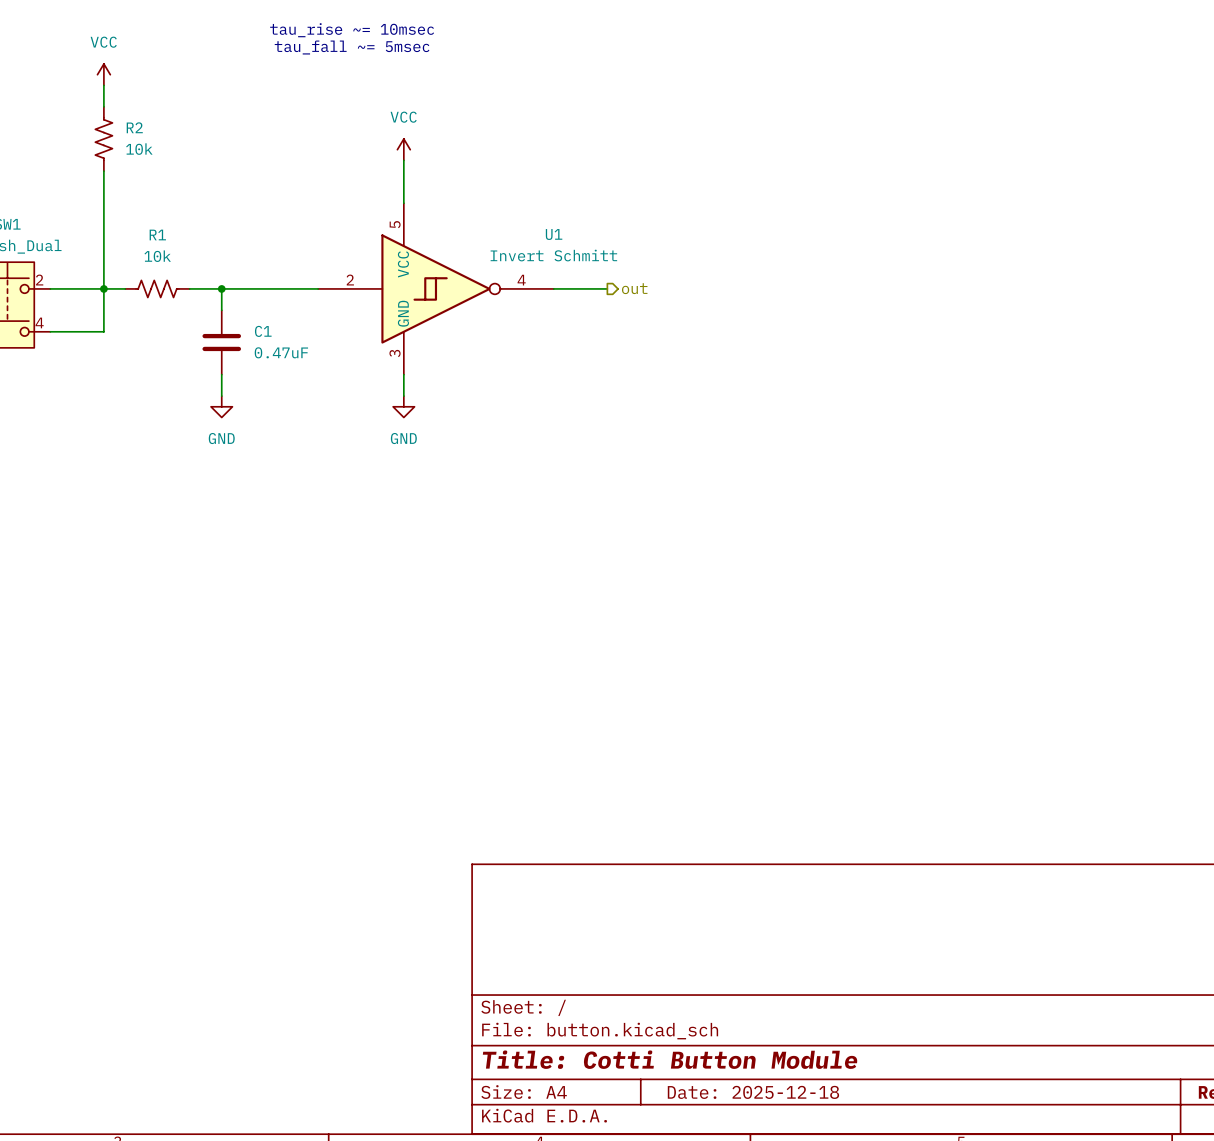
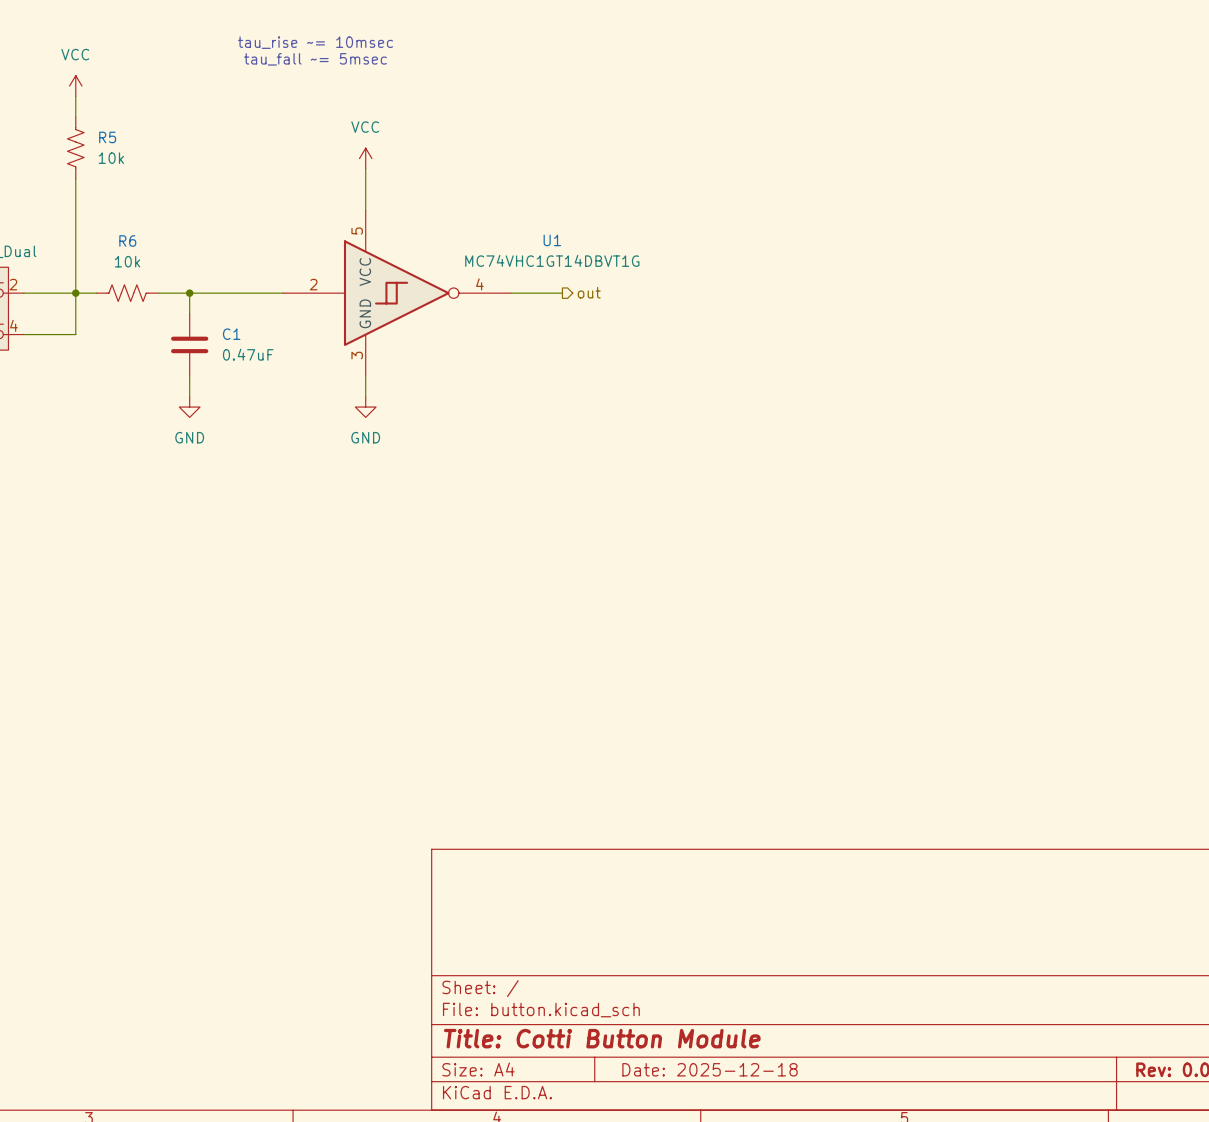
R2 name: R2 (134, 127) -> R5 (107, 137)
U1 name position: U1 (554, 234) -> U1 (552, 240)
R1 name: R1 (157, 235) -> R6 (127, 240)
U1 value: Invert Schmitt (553, 255) -> MC74VHC1GT14DBVT1G (552, 260)

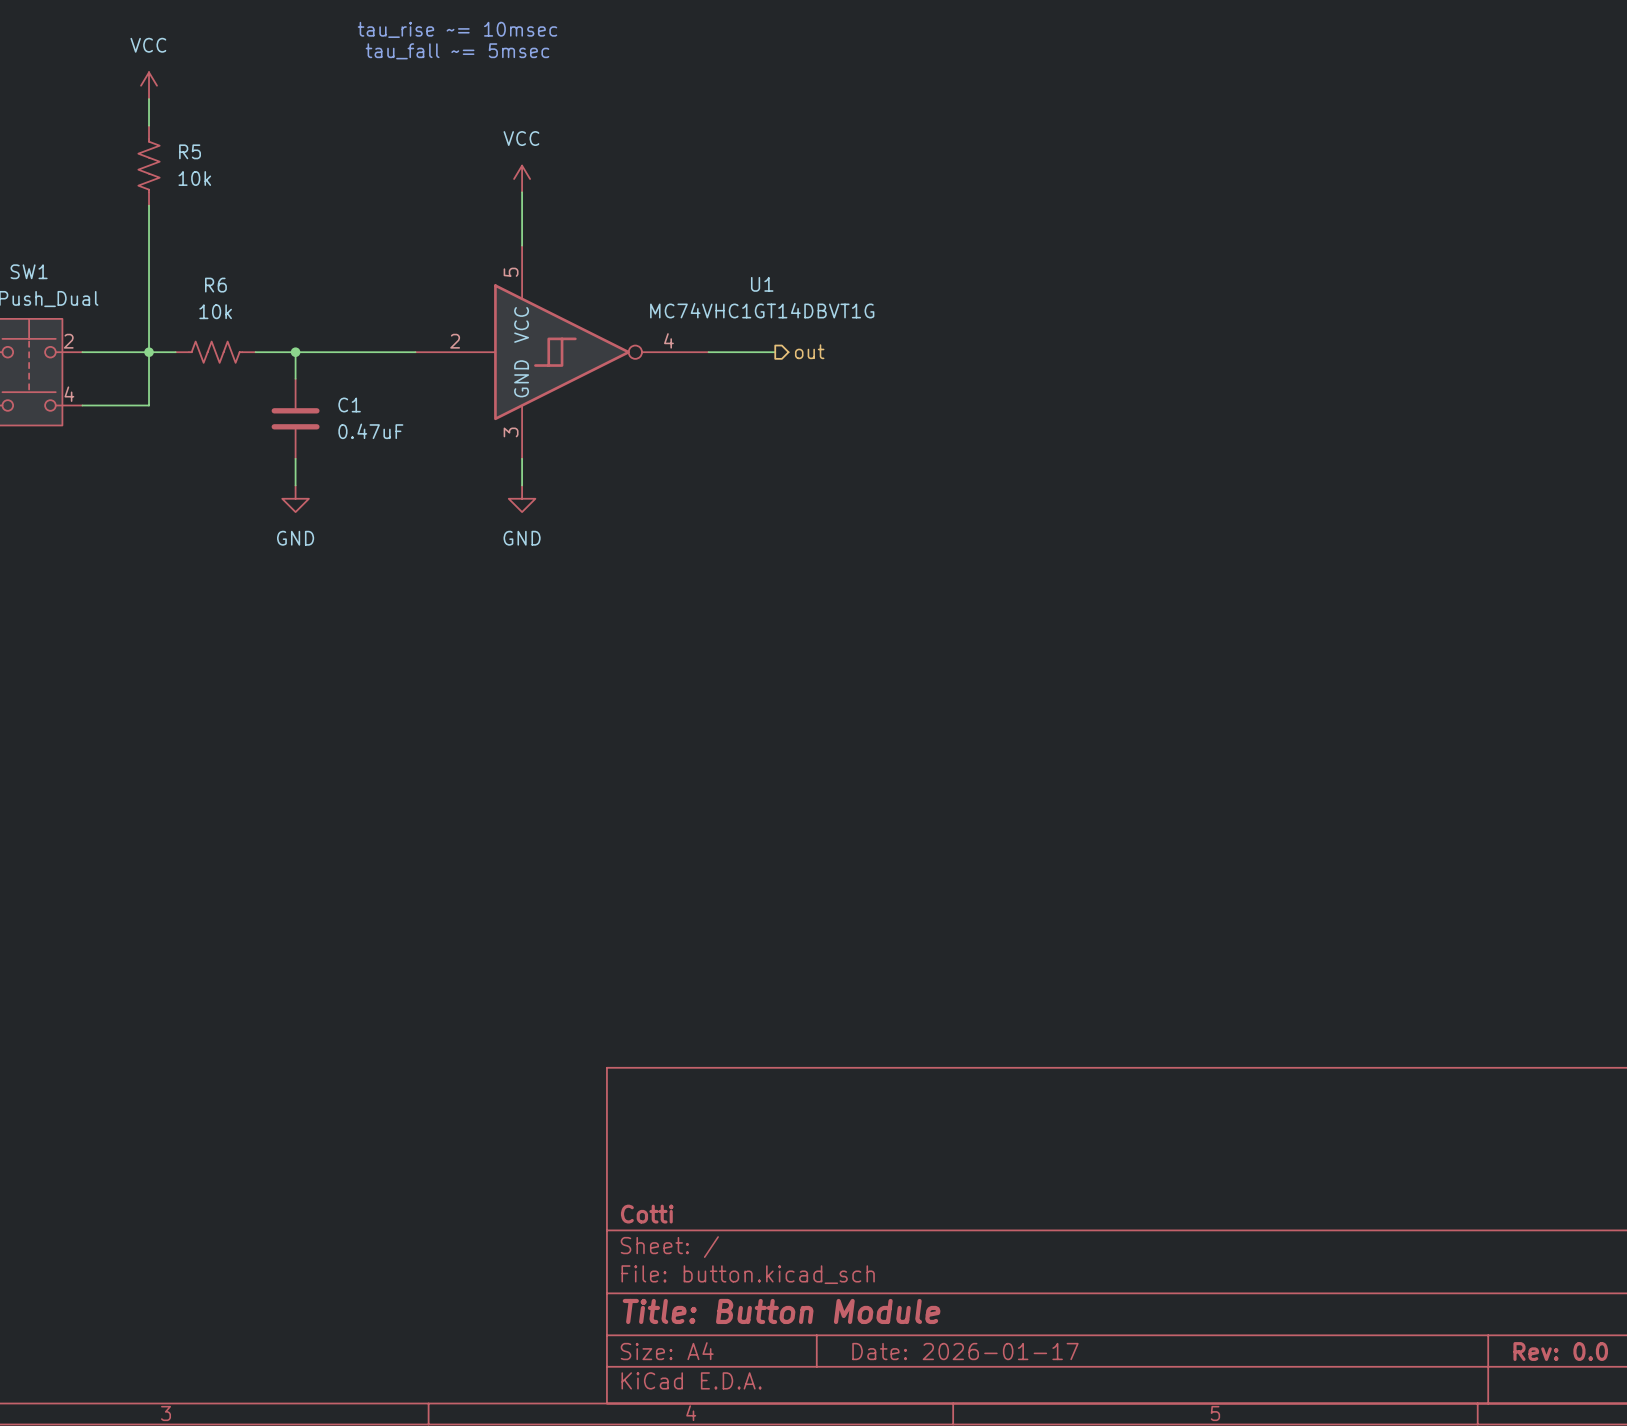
title block: none -> Cotti (647, 1214)
title block: Title: Cotti Button Module (602, 1038) -> Title: Button Module (781, 1311)
title block: Date: 2025-12-18 (709, 1069) -> Date: 2026-01-17 (965, 1351)

